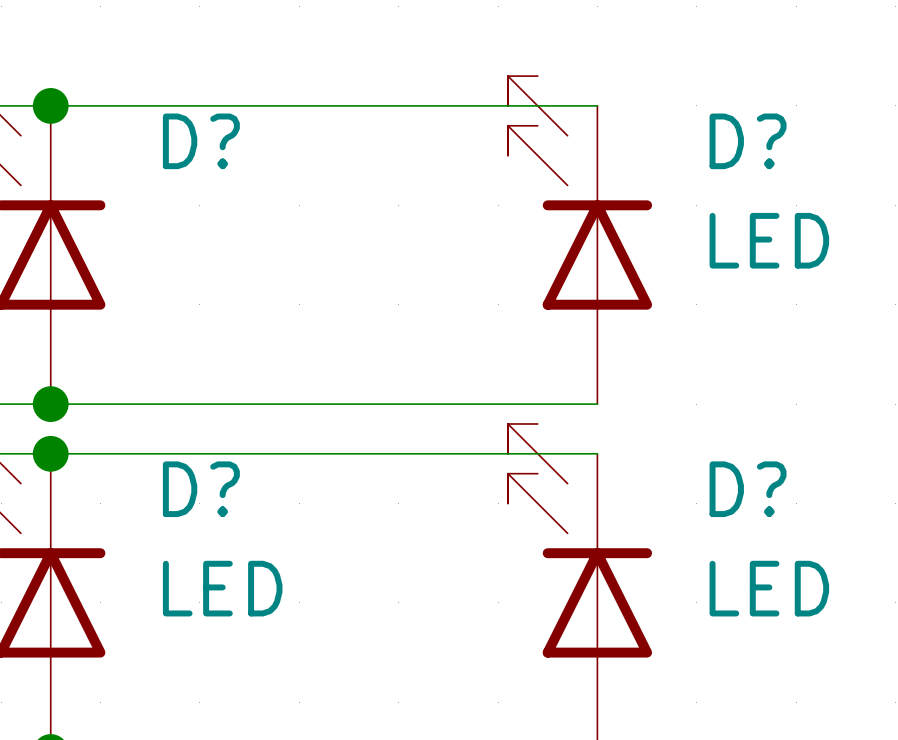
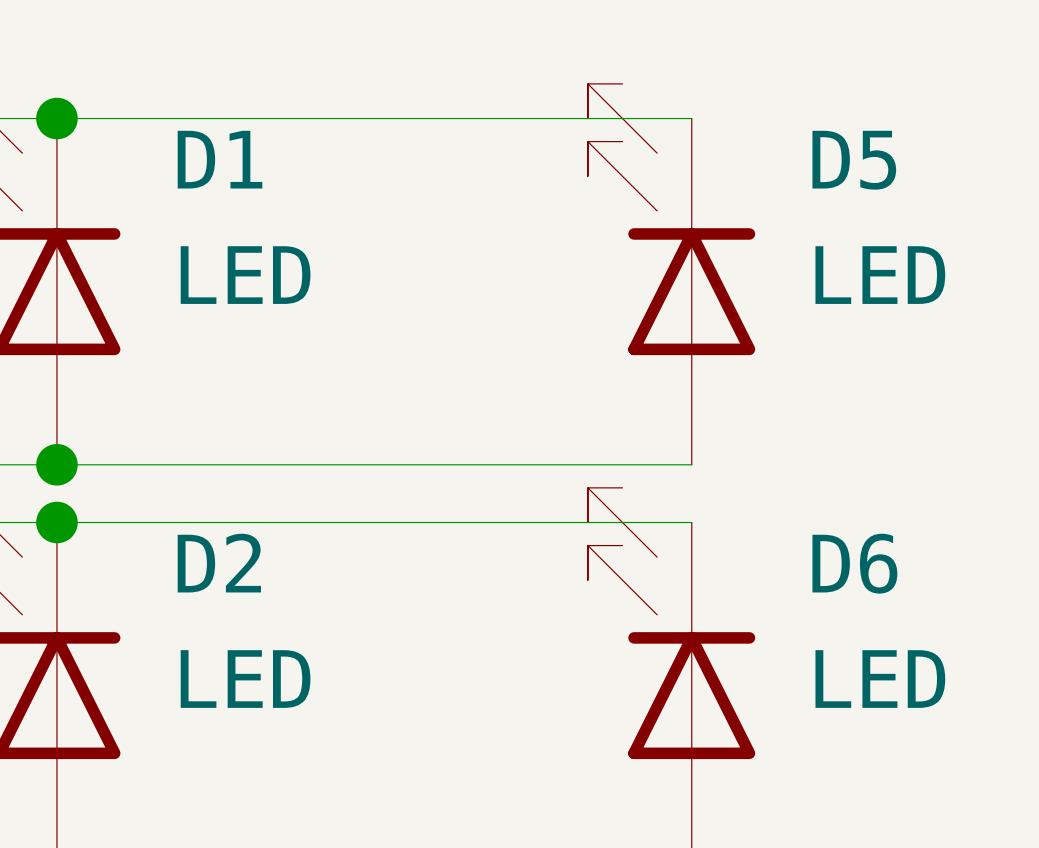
D? name: D? (201, 141) -> D1 (220, 159)
D? name: D? (748, 141) -> D5 (854, 160)
D? value: none -> LED (245, 275)
D? name: D? (201, 489) -> D2 (219, 563)
D? name: D? (748, 489) -> D6 (854, 563)

